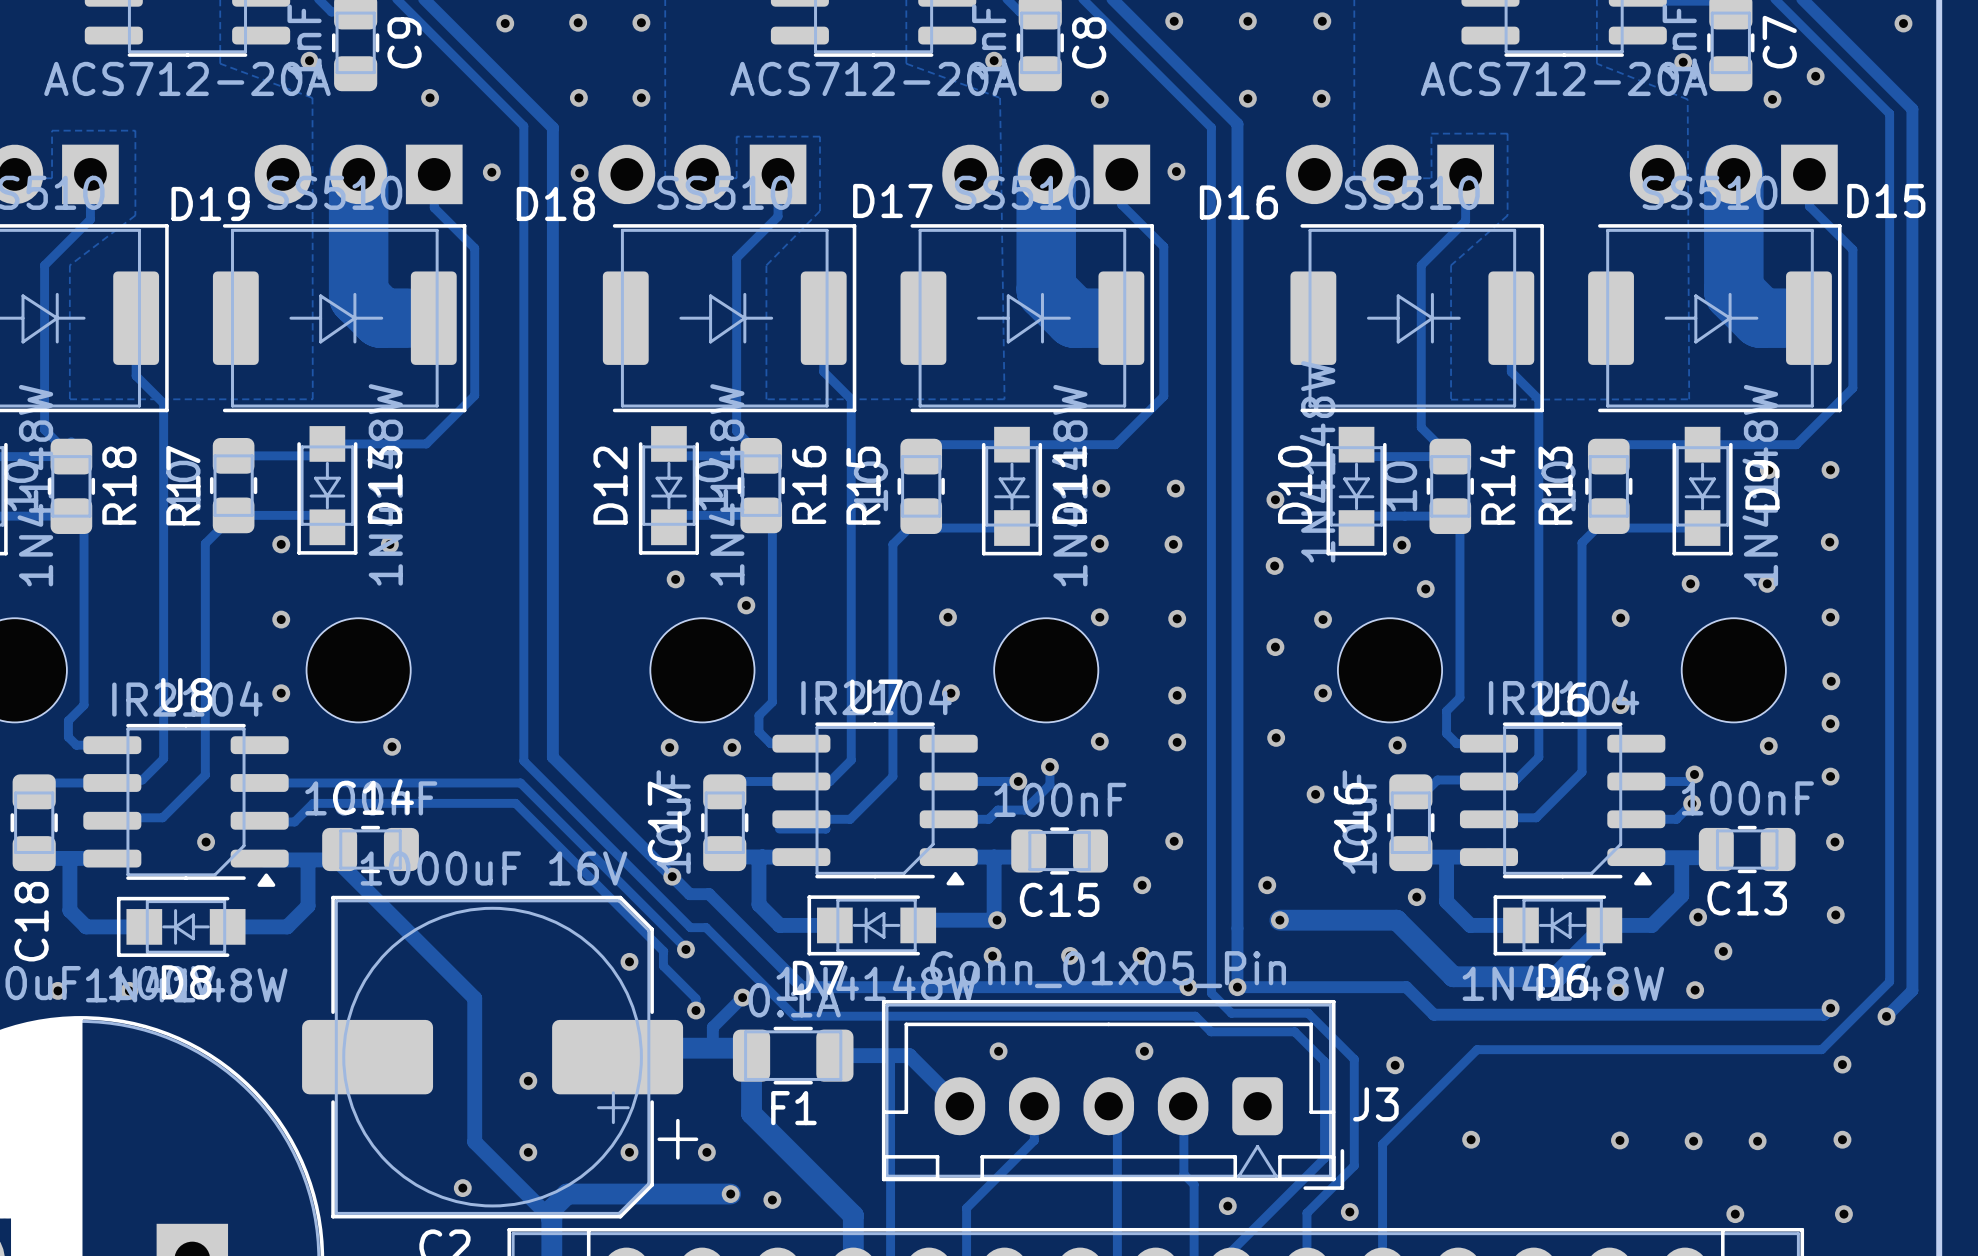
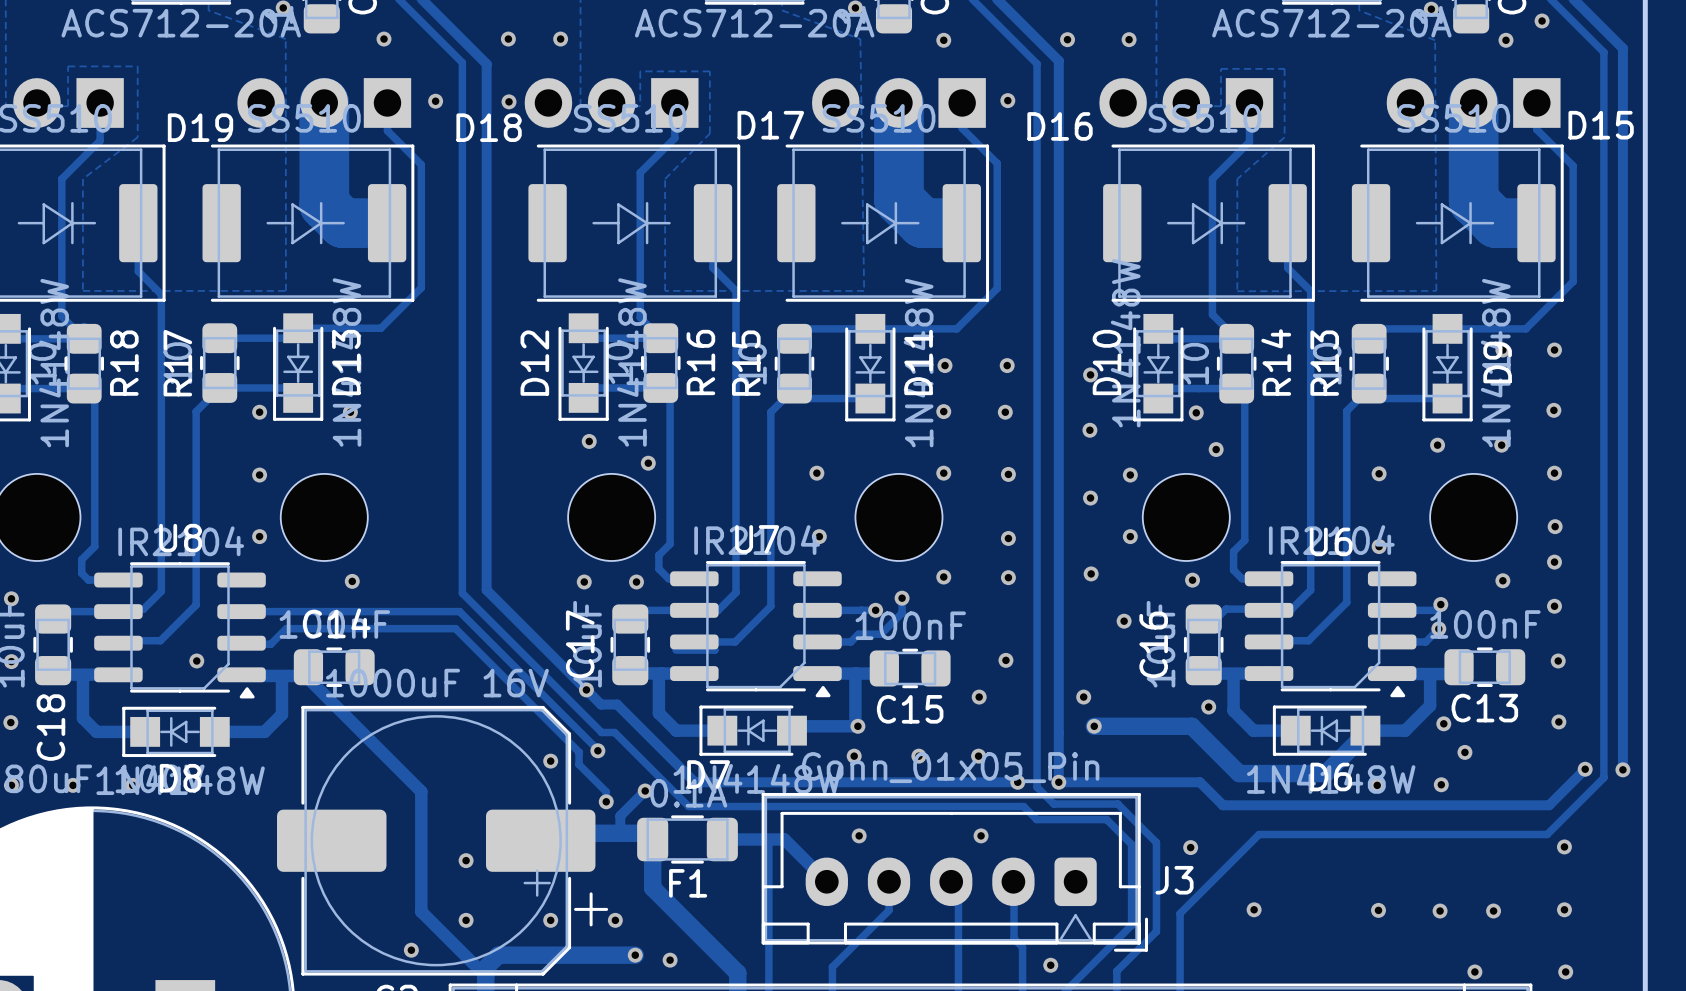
track: none -> (1585, 769) (1554, 799)
via: none -> (1585, 769)
track: (1912, 972) (1912, 990) (1886, 1016) -> none
via: none -> (1622, 769)
via: (1830, 1008) -> none
via: (1886, 1016) -> none
via: (1349, 1212) -> none

